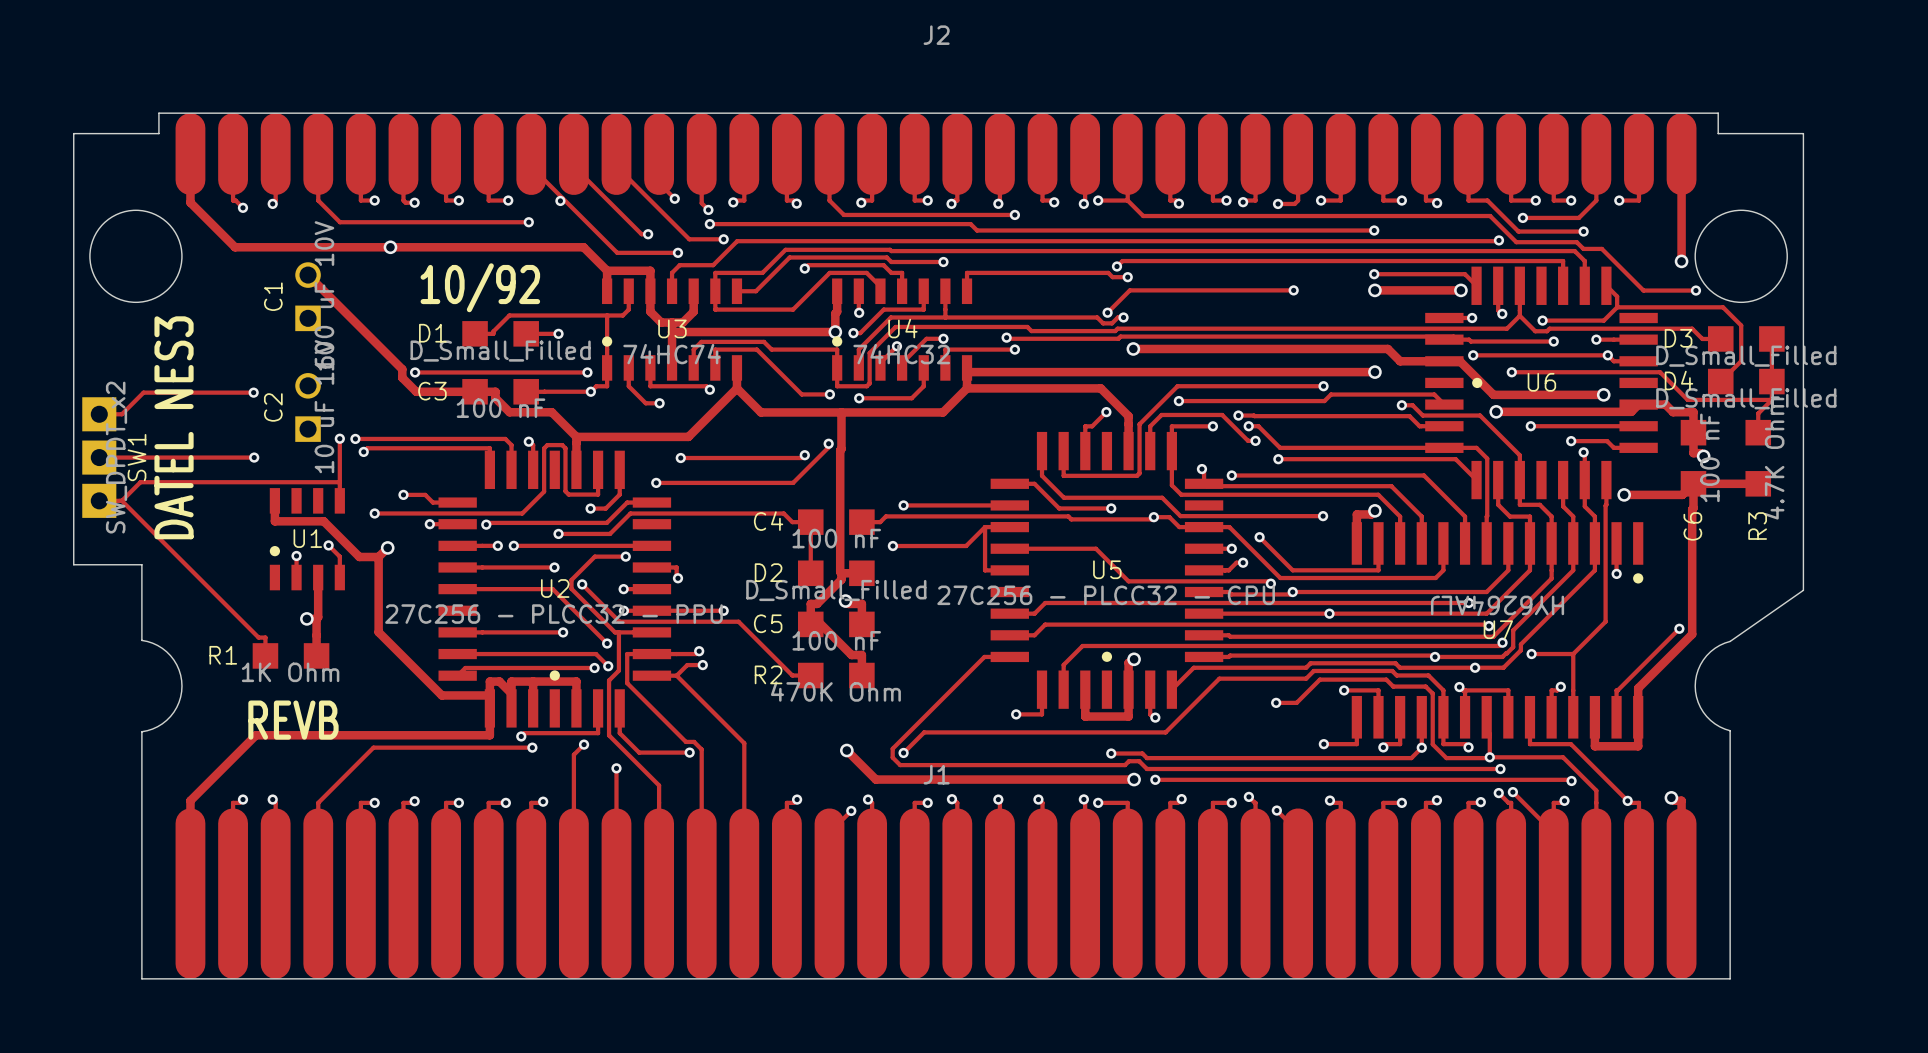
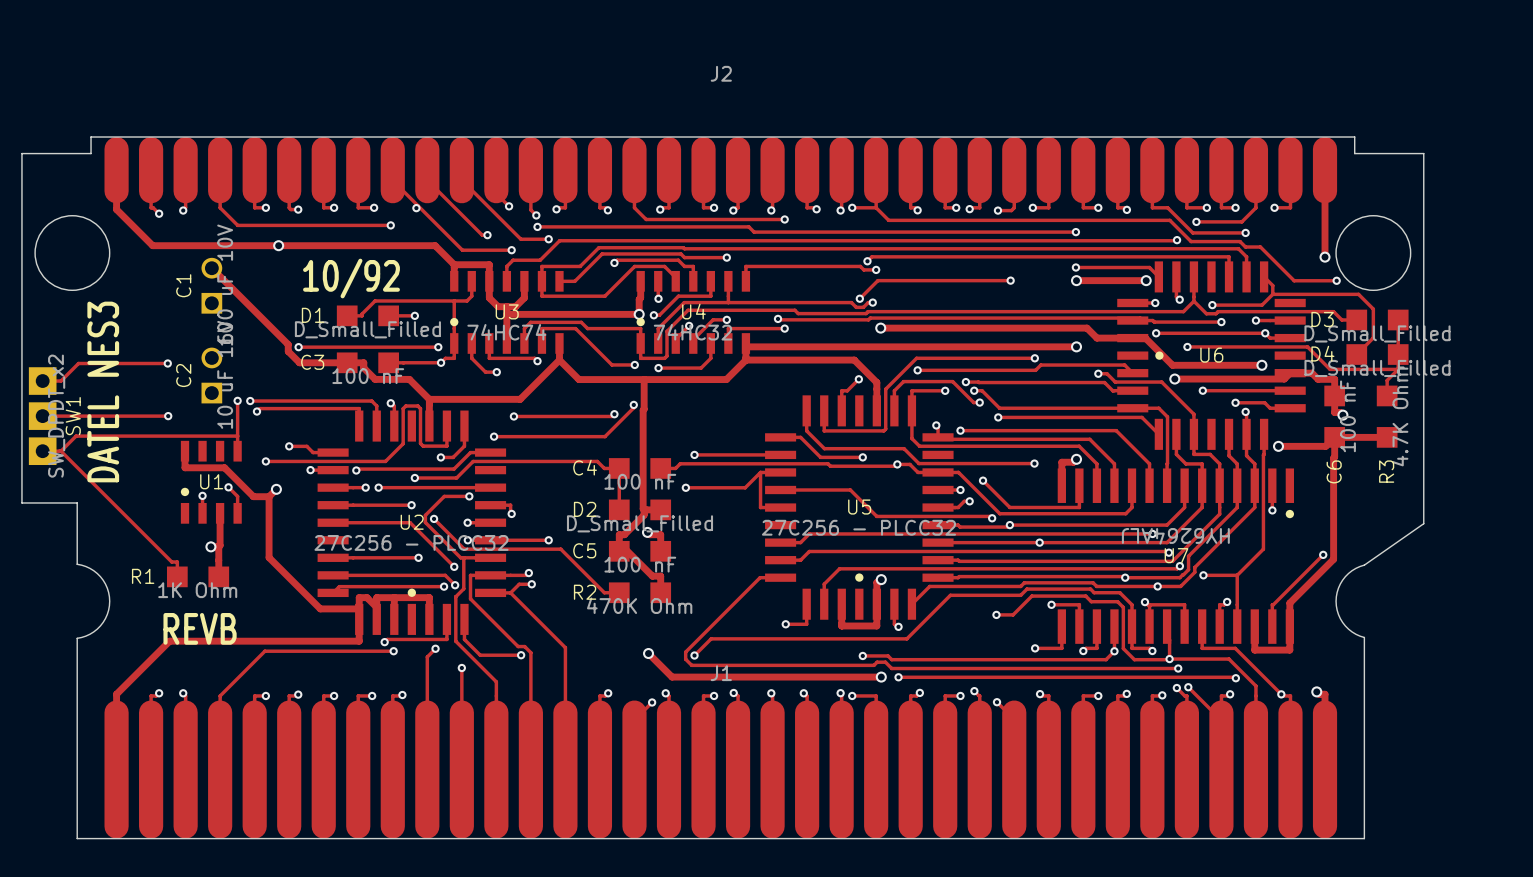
U5 value: 27C256 - PLCC32 - CPU (1106, 595) -> 27C256 - PLCC32 (858, 527)
U2 value: 27C256 - PLCC32 - PPU (553, 614) -> 27C256 - PLCC32 (411, 542)

